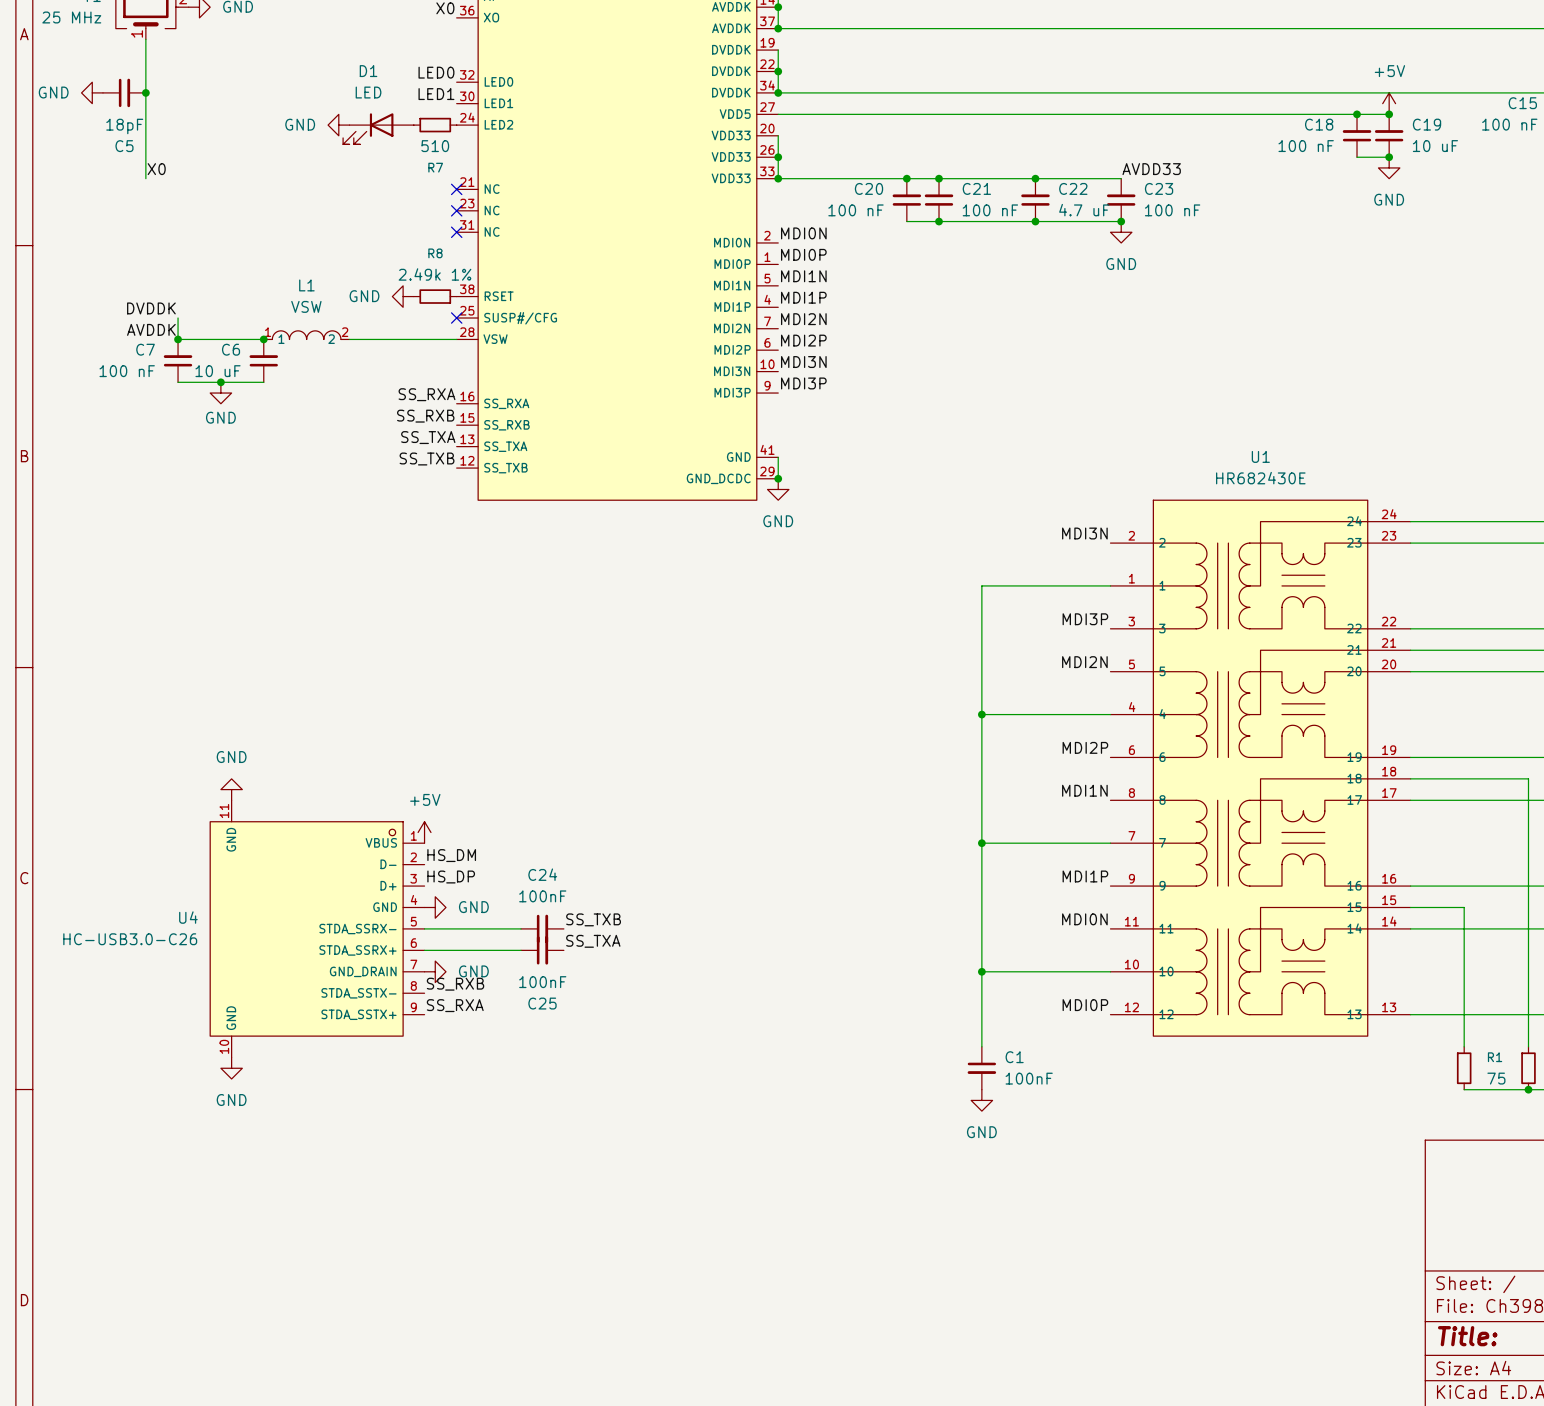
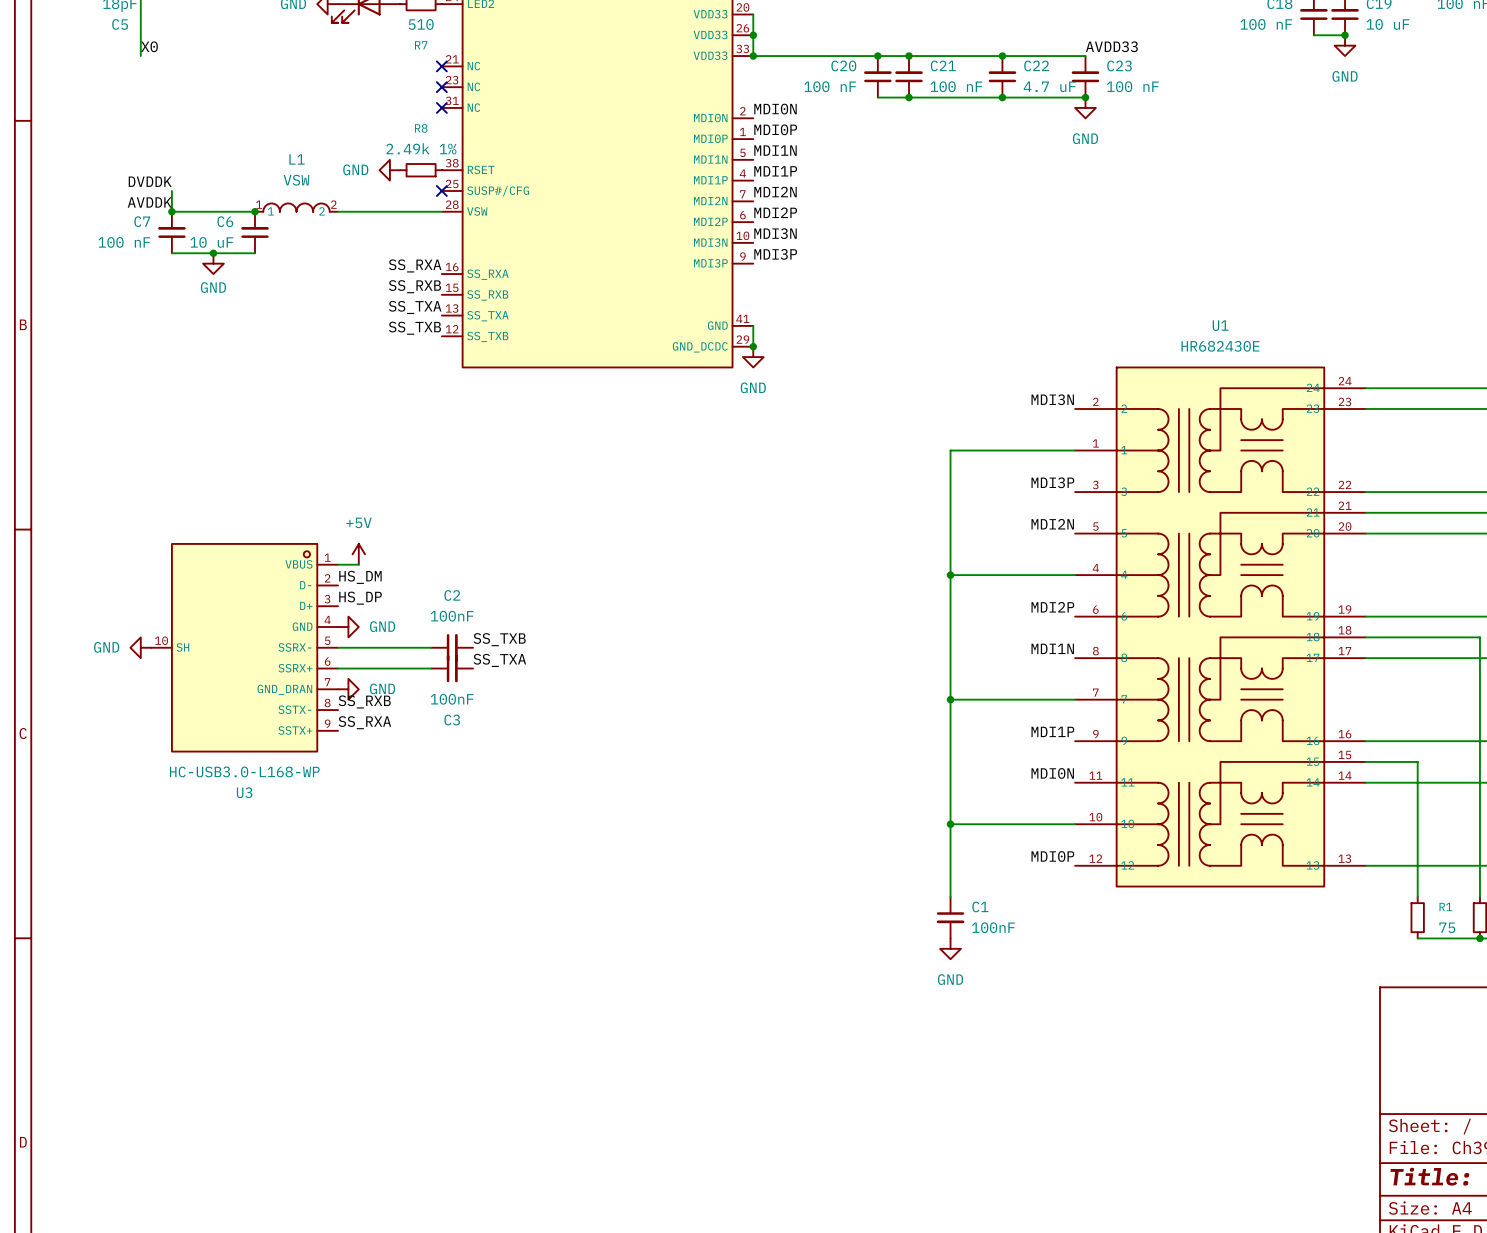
wire: none -> (338, 564) (358, 564)
power symbol: none -> GND (348, 627)
power symbol: none -> GND (140, 647)
power symbol: GND (231, 789) -> none
U3: none -> HC-USB3.0-L168-WP (244, 647)
C2: none -> 100nF (452, 647)
C3: none -> 100nF (452, 668)
power symbol: none -> GND (348, 689)
power symbol position: +5V (424, 832) -> +5V (358, 554)
label position: HS_DM (451, 855) -> HS_DM (360, 577)
label position: HS_DP (451, 877) -> HS_DP (360, 598)
power symbol: GND (435, 907) -> none
label position: SS_TXB (593, 919) -> SS_TXB (499, 639)
U4: HC-USB3.0-C26 (317, 928) -> none
wire: (424, 928) (521, 928) -> (338, 647) (431, 647)
C24: 100nF (542, 928) -> none
label position: SS_TXA (593, 941) -> SS_TXA (499, 660)
wire: (424, 950) (521, 950) -> (338, 668) (431, 668)
C25: 100nF (542, 950) -> none
power symbol: GND (435, 971) -> none
label position: SS_RXB (455, 984) -> SS_RXB (364, 701)
label position: SS_RXA (455, 1005) -> SS_RXA (364, 722)
power symbol: GND (231, 1068) -> none

